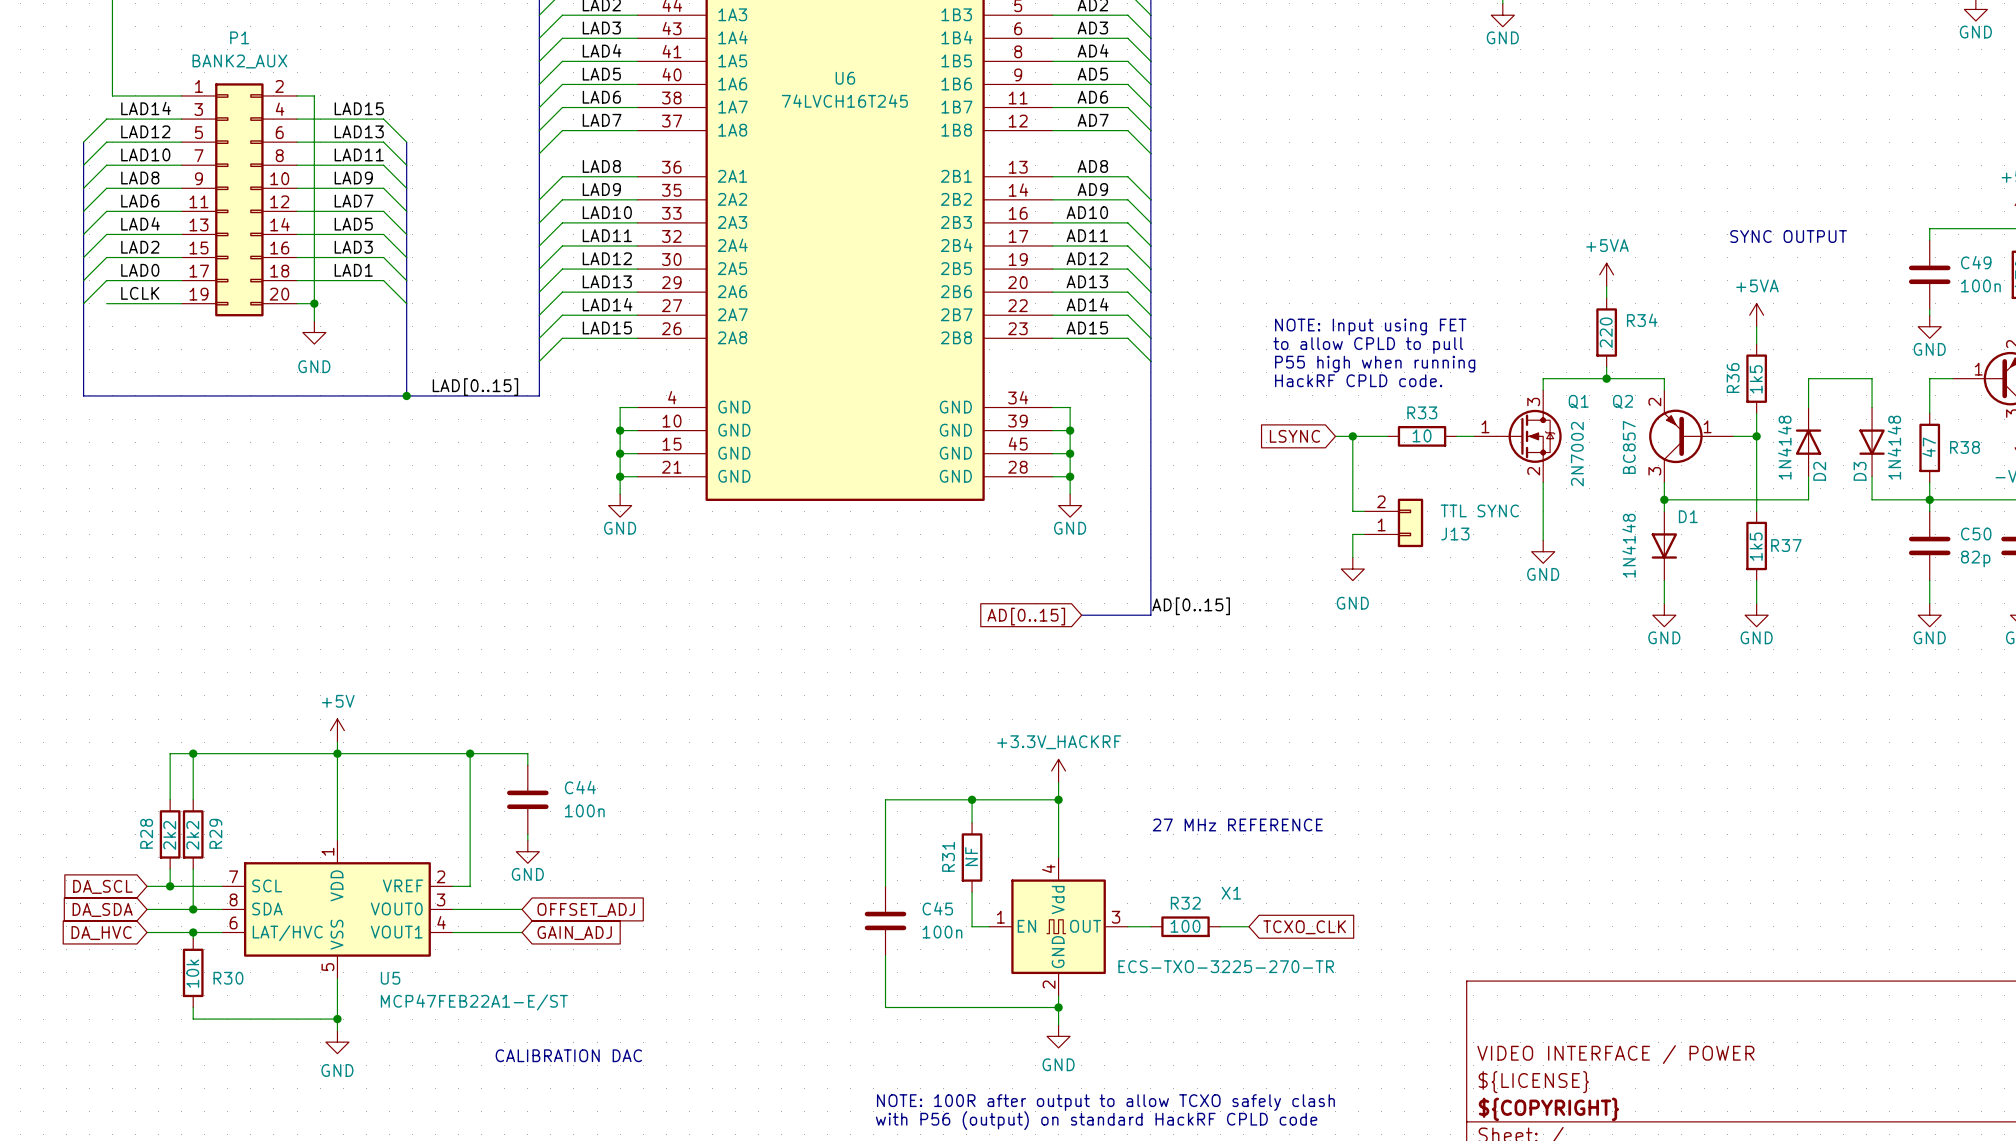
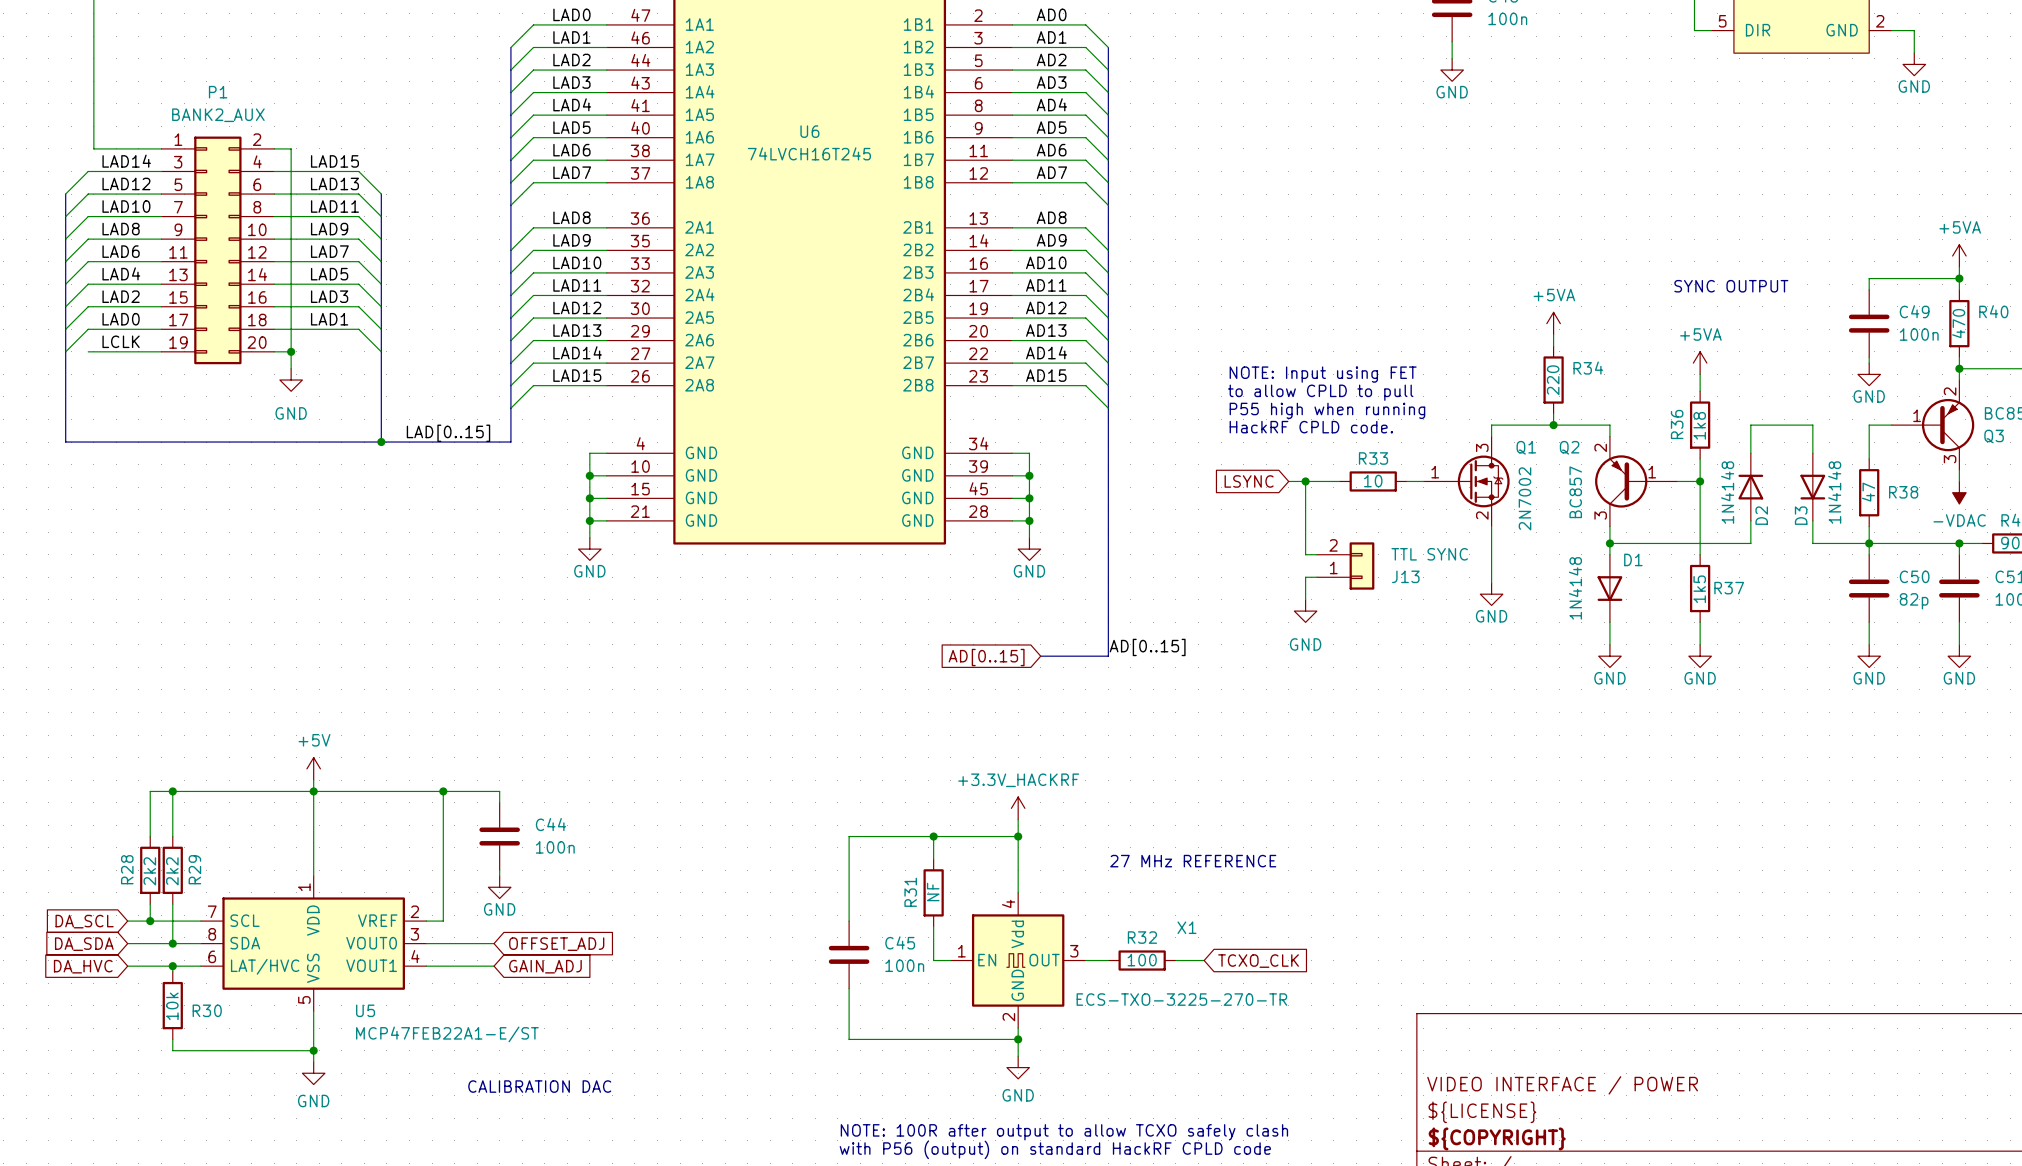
R36 value: 1k5 (1756, 379) -> 1k8 (1699, 425)

